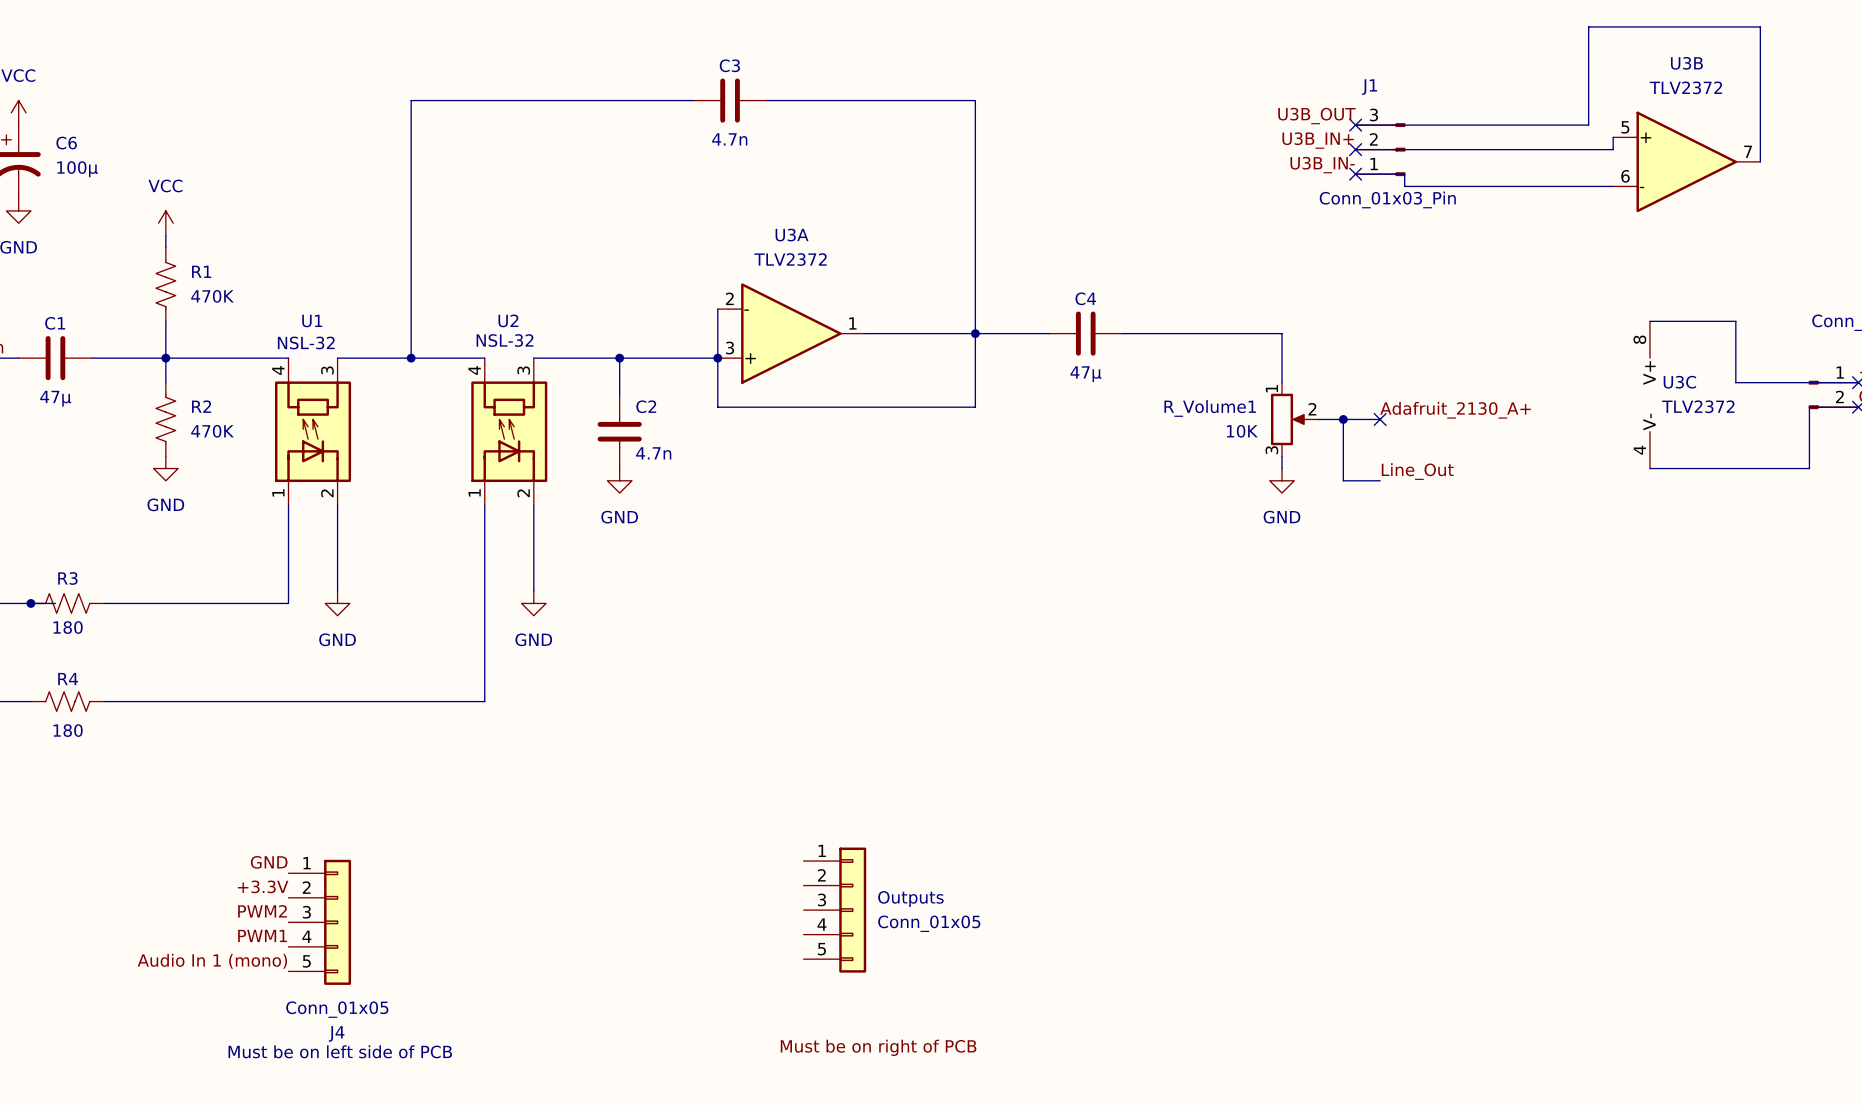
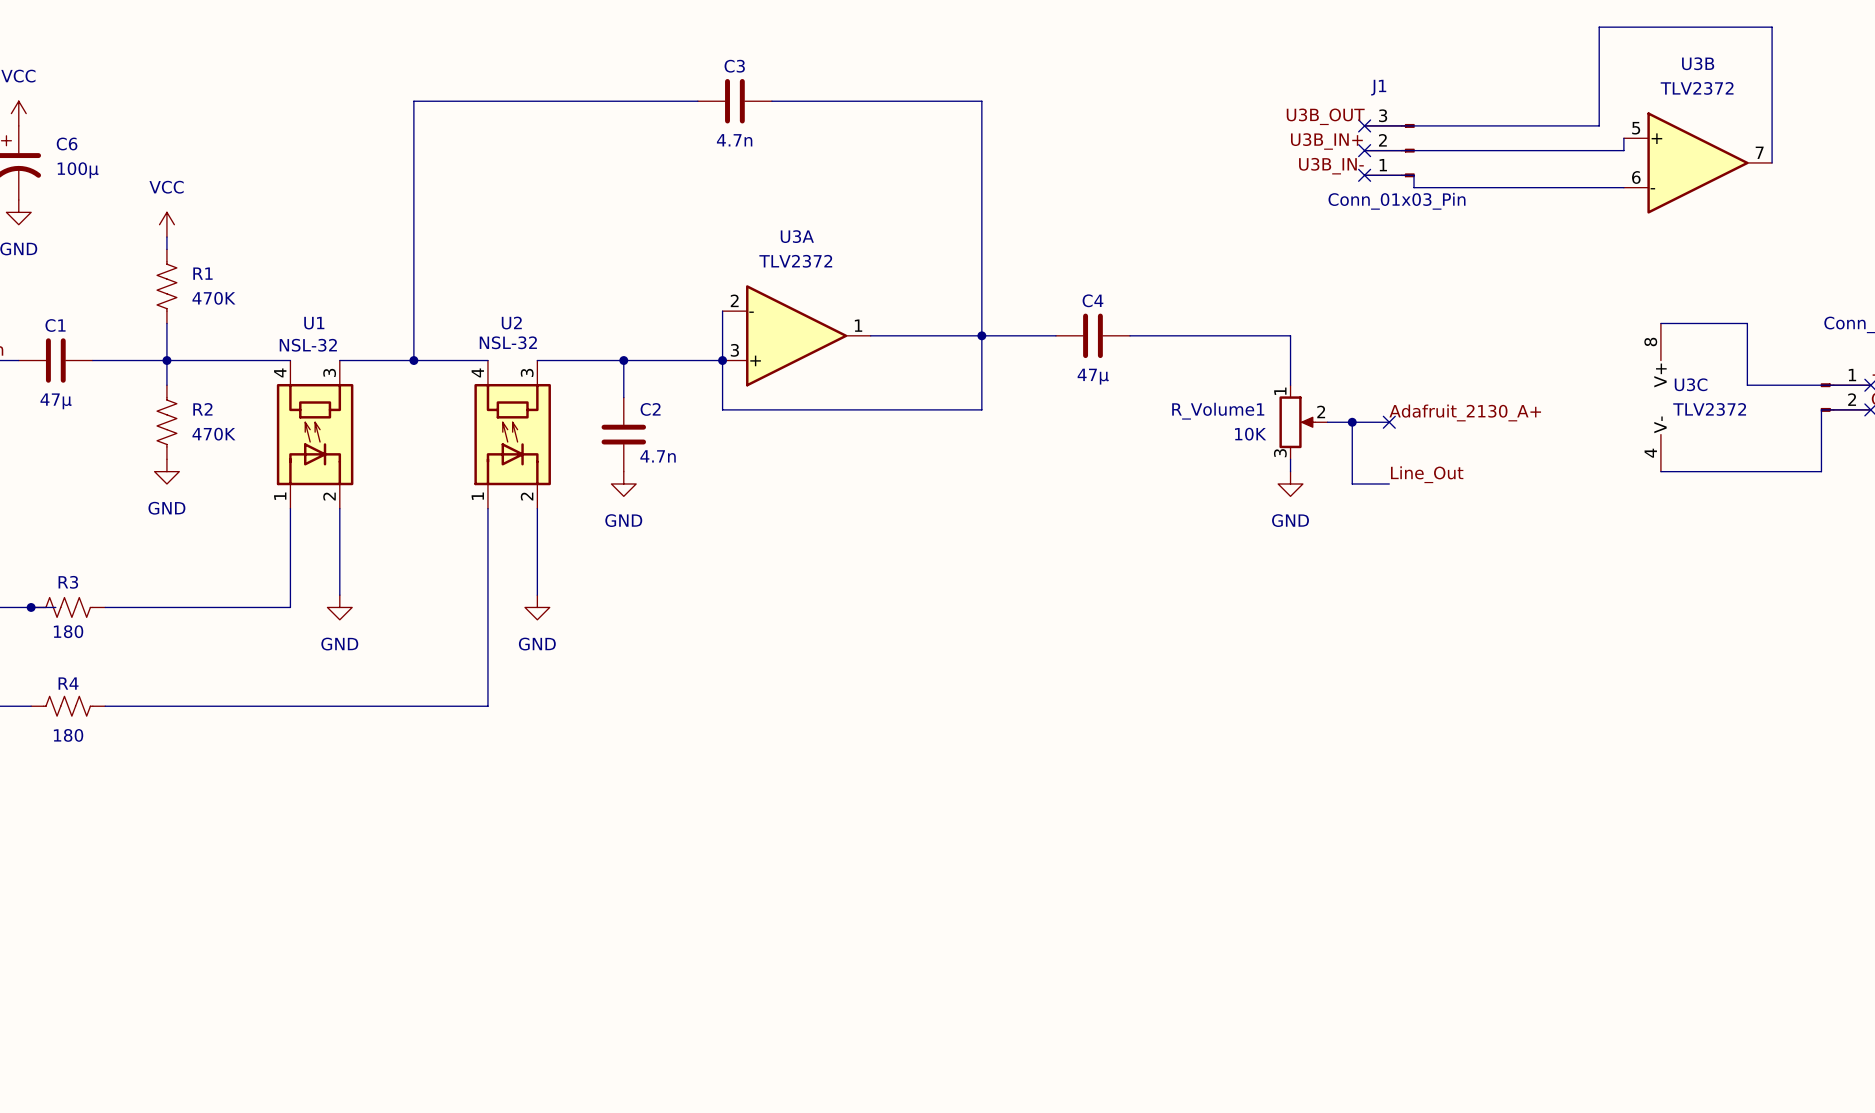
label: GND (269, 862) -> none
label: +3.3V (263, 886) -> none
Outputs: Conn_01x05 (834, 910) -> none
label: PWM2 (262, 911) -> none
J4: Conn_01x05 (319, 922) -> none
label: PWM1 (262, 935) -> none
label: Audio In 1 (mono) (212, 961) -> none
label: Must be on right of PCB (878, 1047) -> none
text: Must be on left side of PCB (340, 1051) -> none

